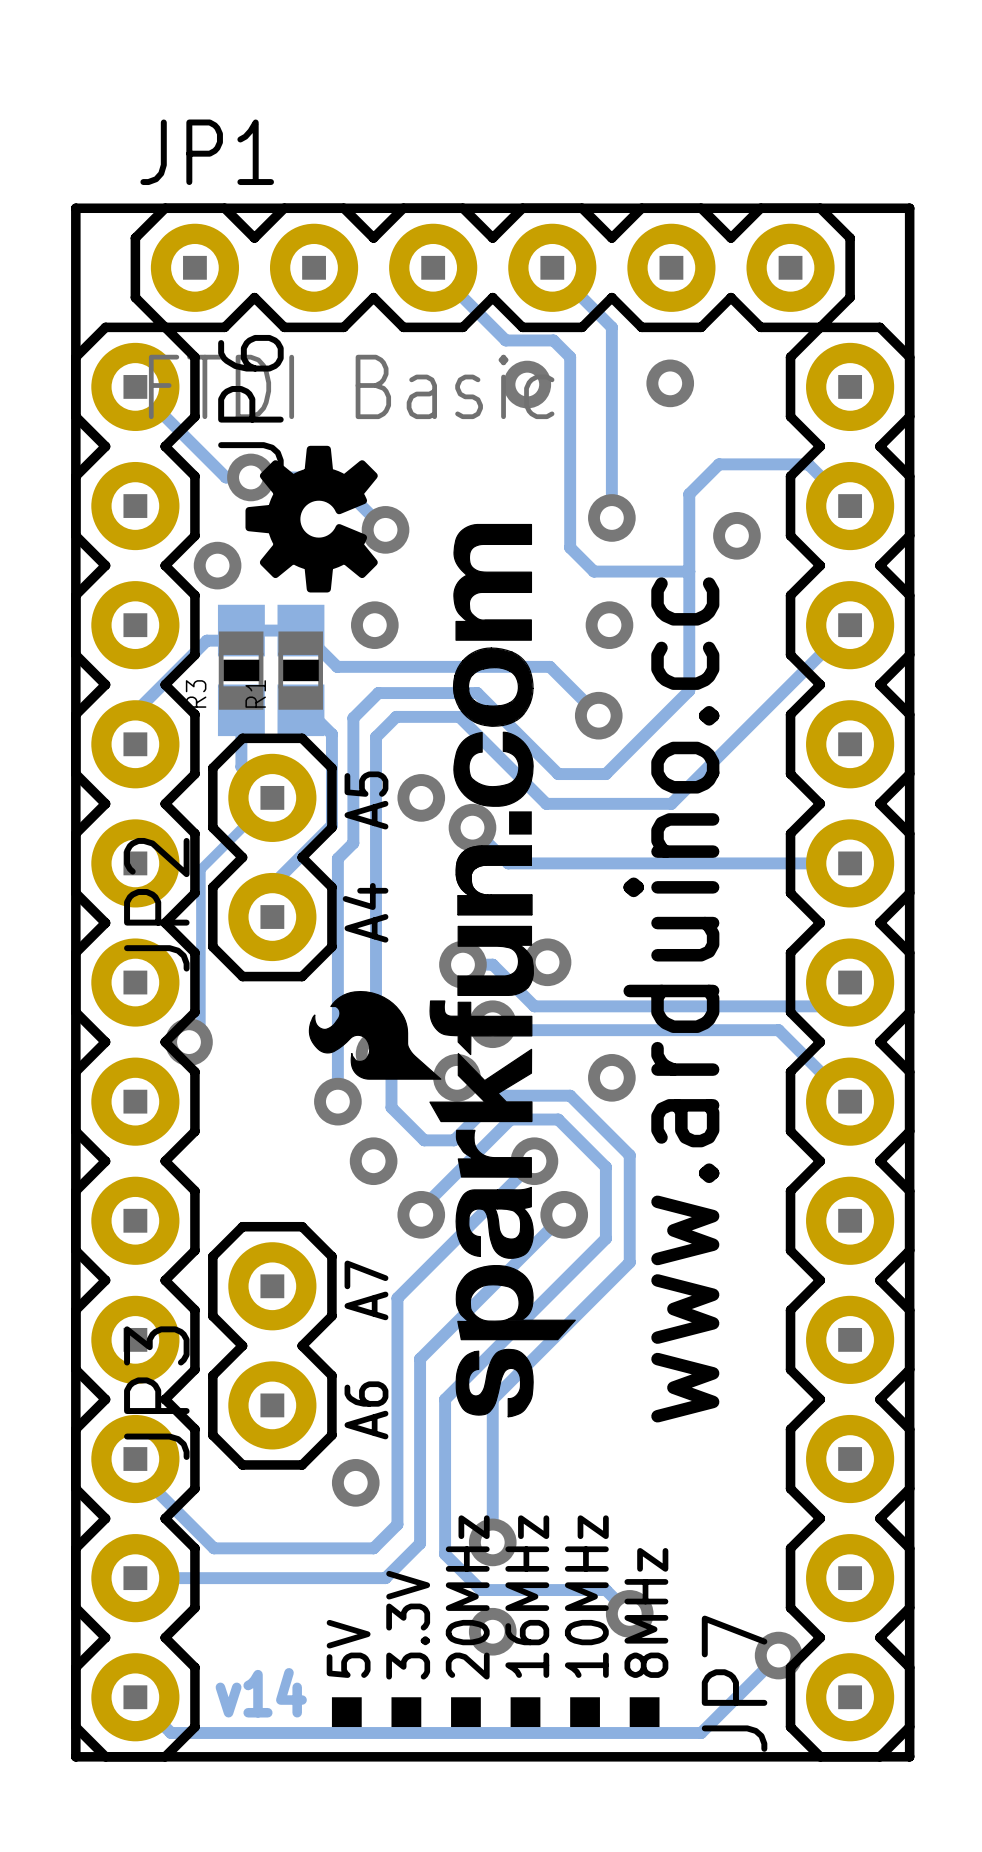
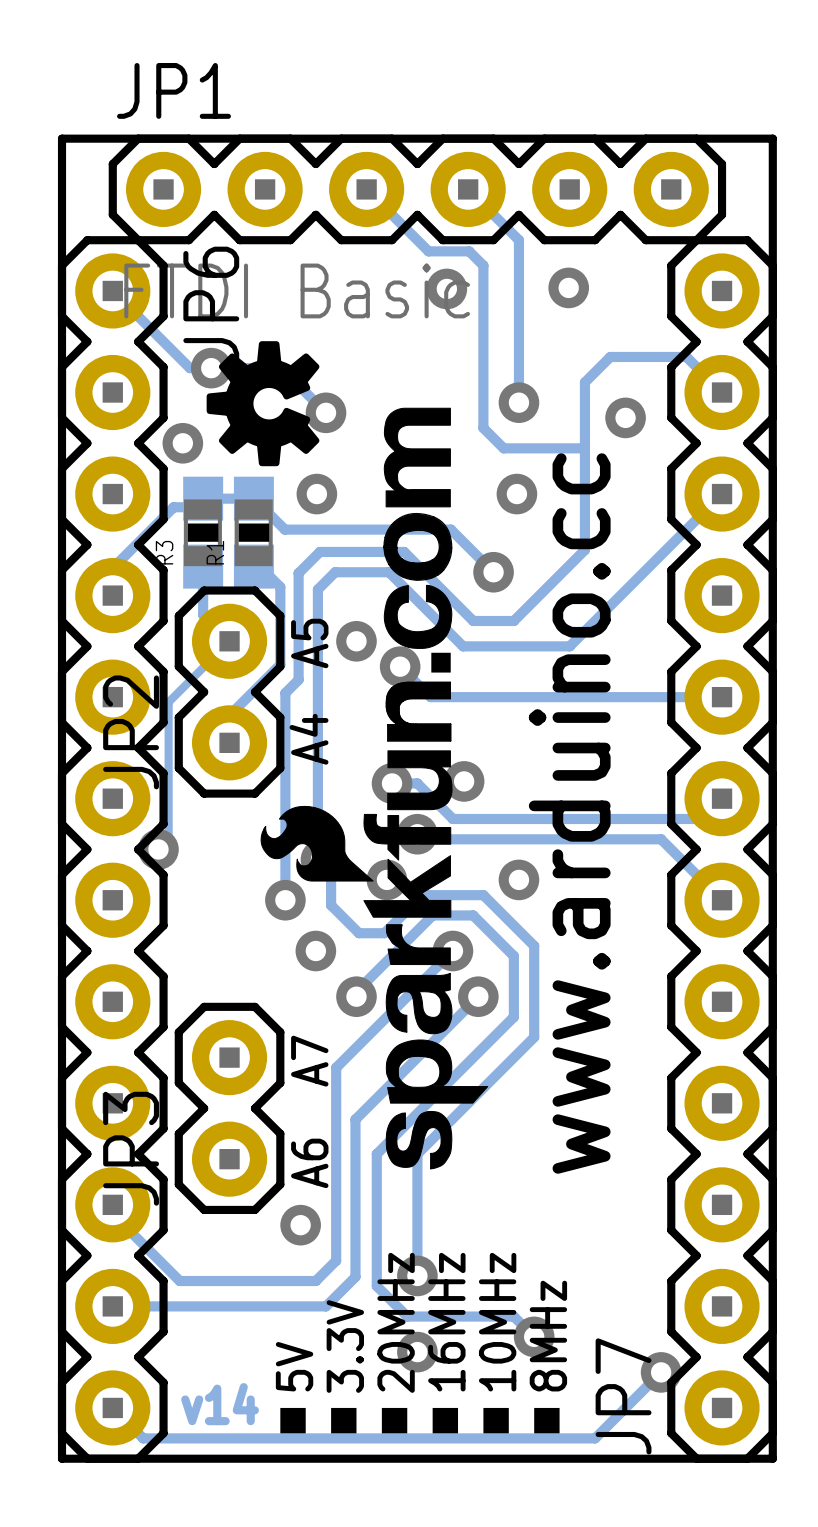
track: (532, 666) (549, 666) (598, 715) -> (450, 529) (493, 572)
via position: (598, 715) -> (493, 572)

